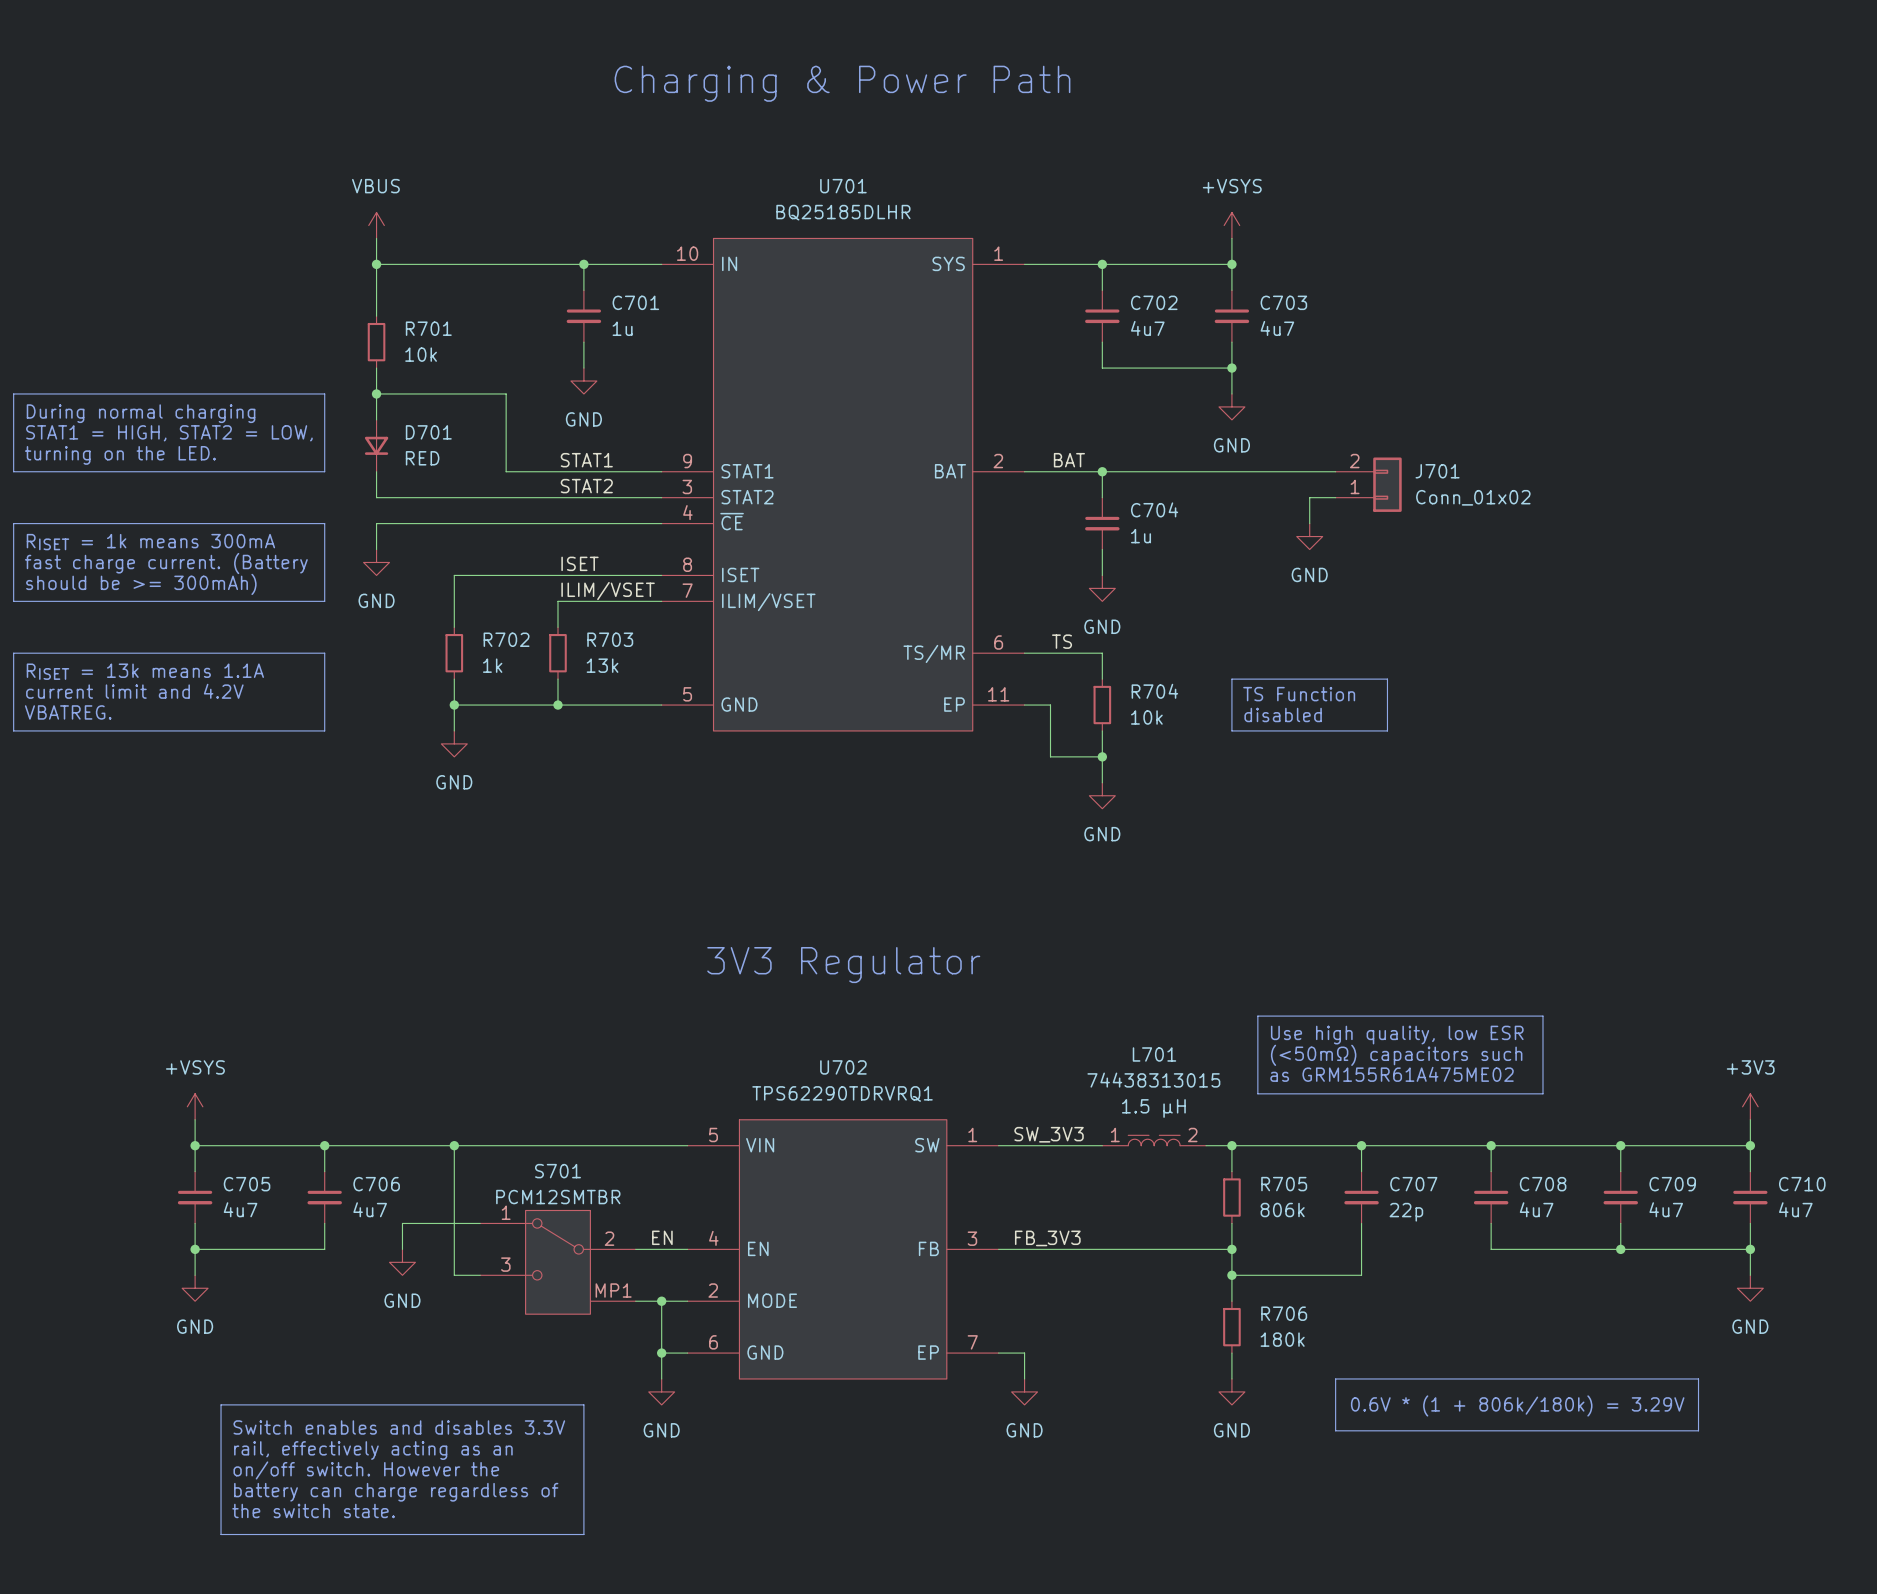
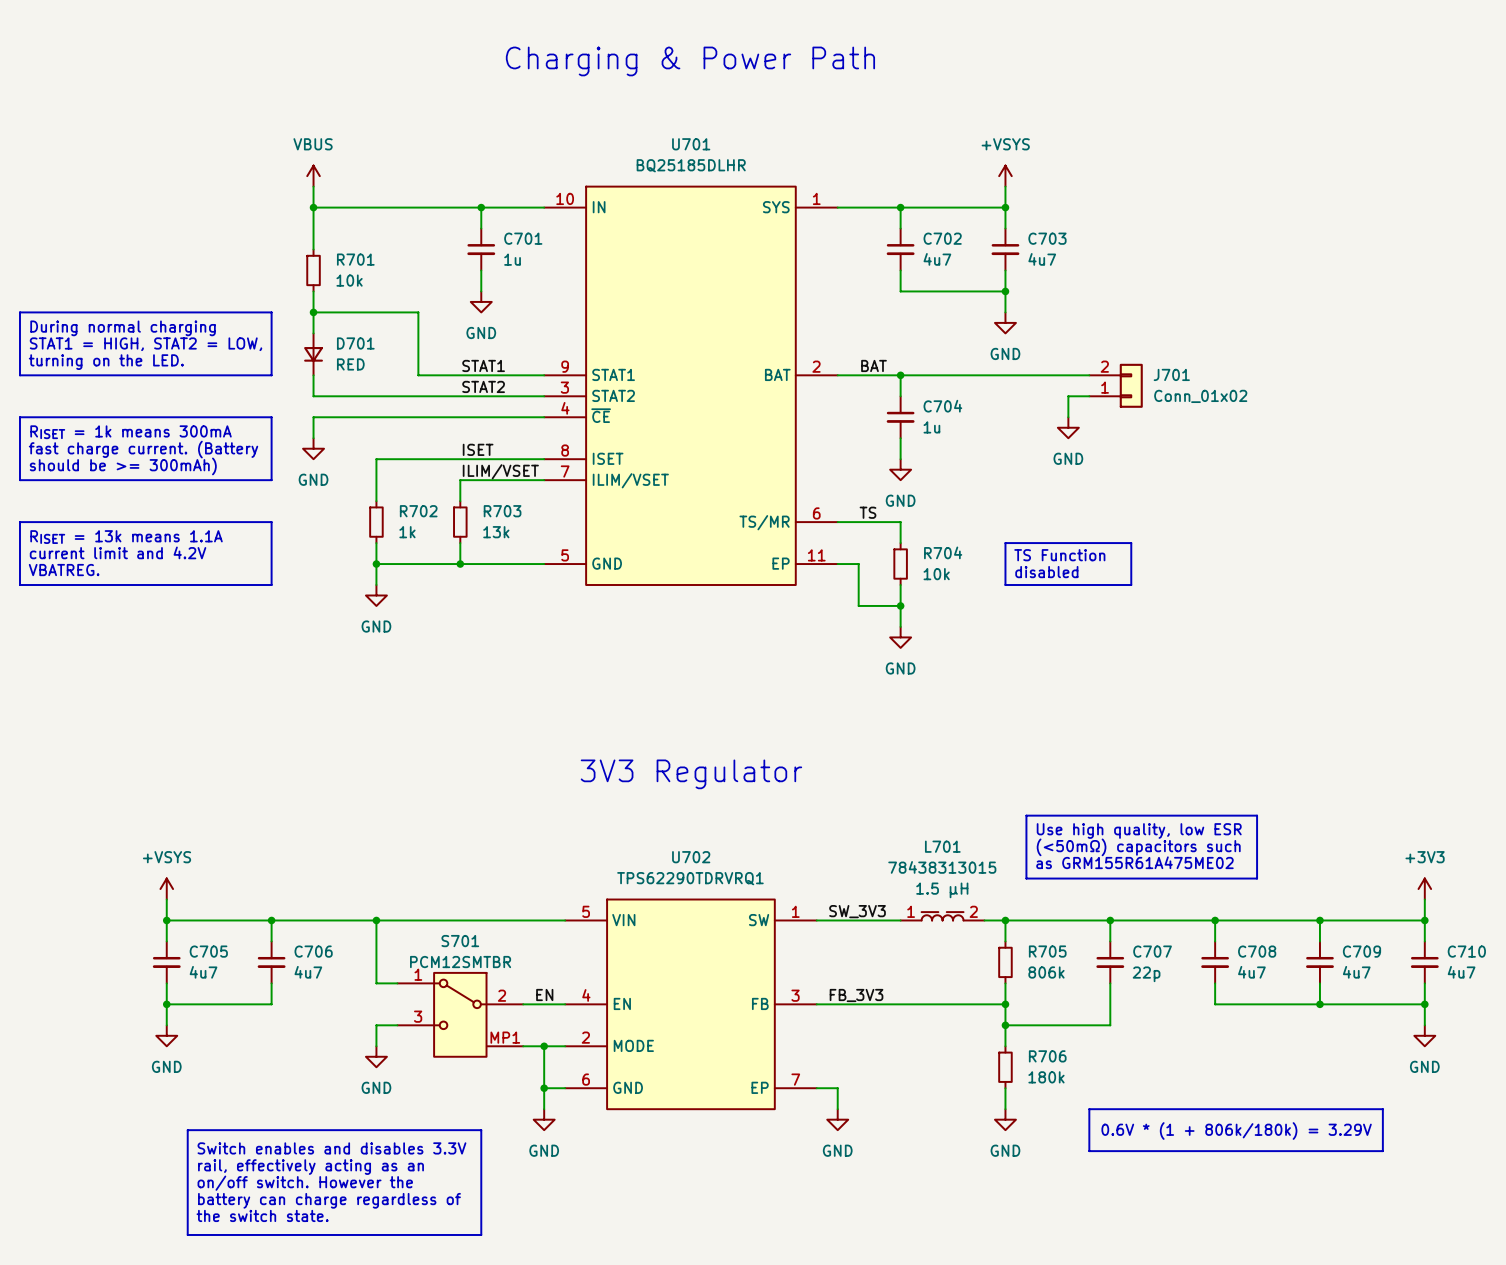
L701 value: 74438313015 (1153, 1080) -> 78438313015 (942, 867)
wire: (402, 1249) (402, 1223) (454, 1223) (454, 1275) -> (376, 1046) (376, 1025)
power symbol position: GND (402, 1262) -> GND (376, 1056)

